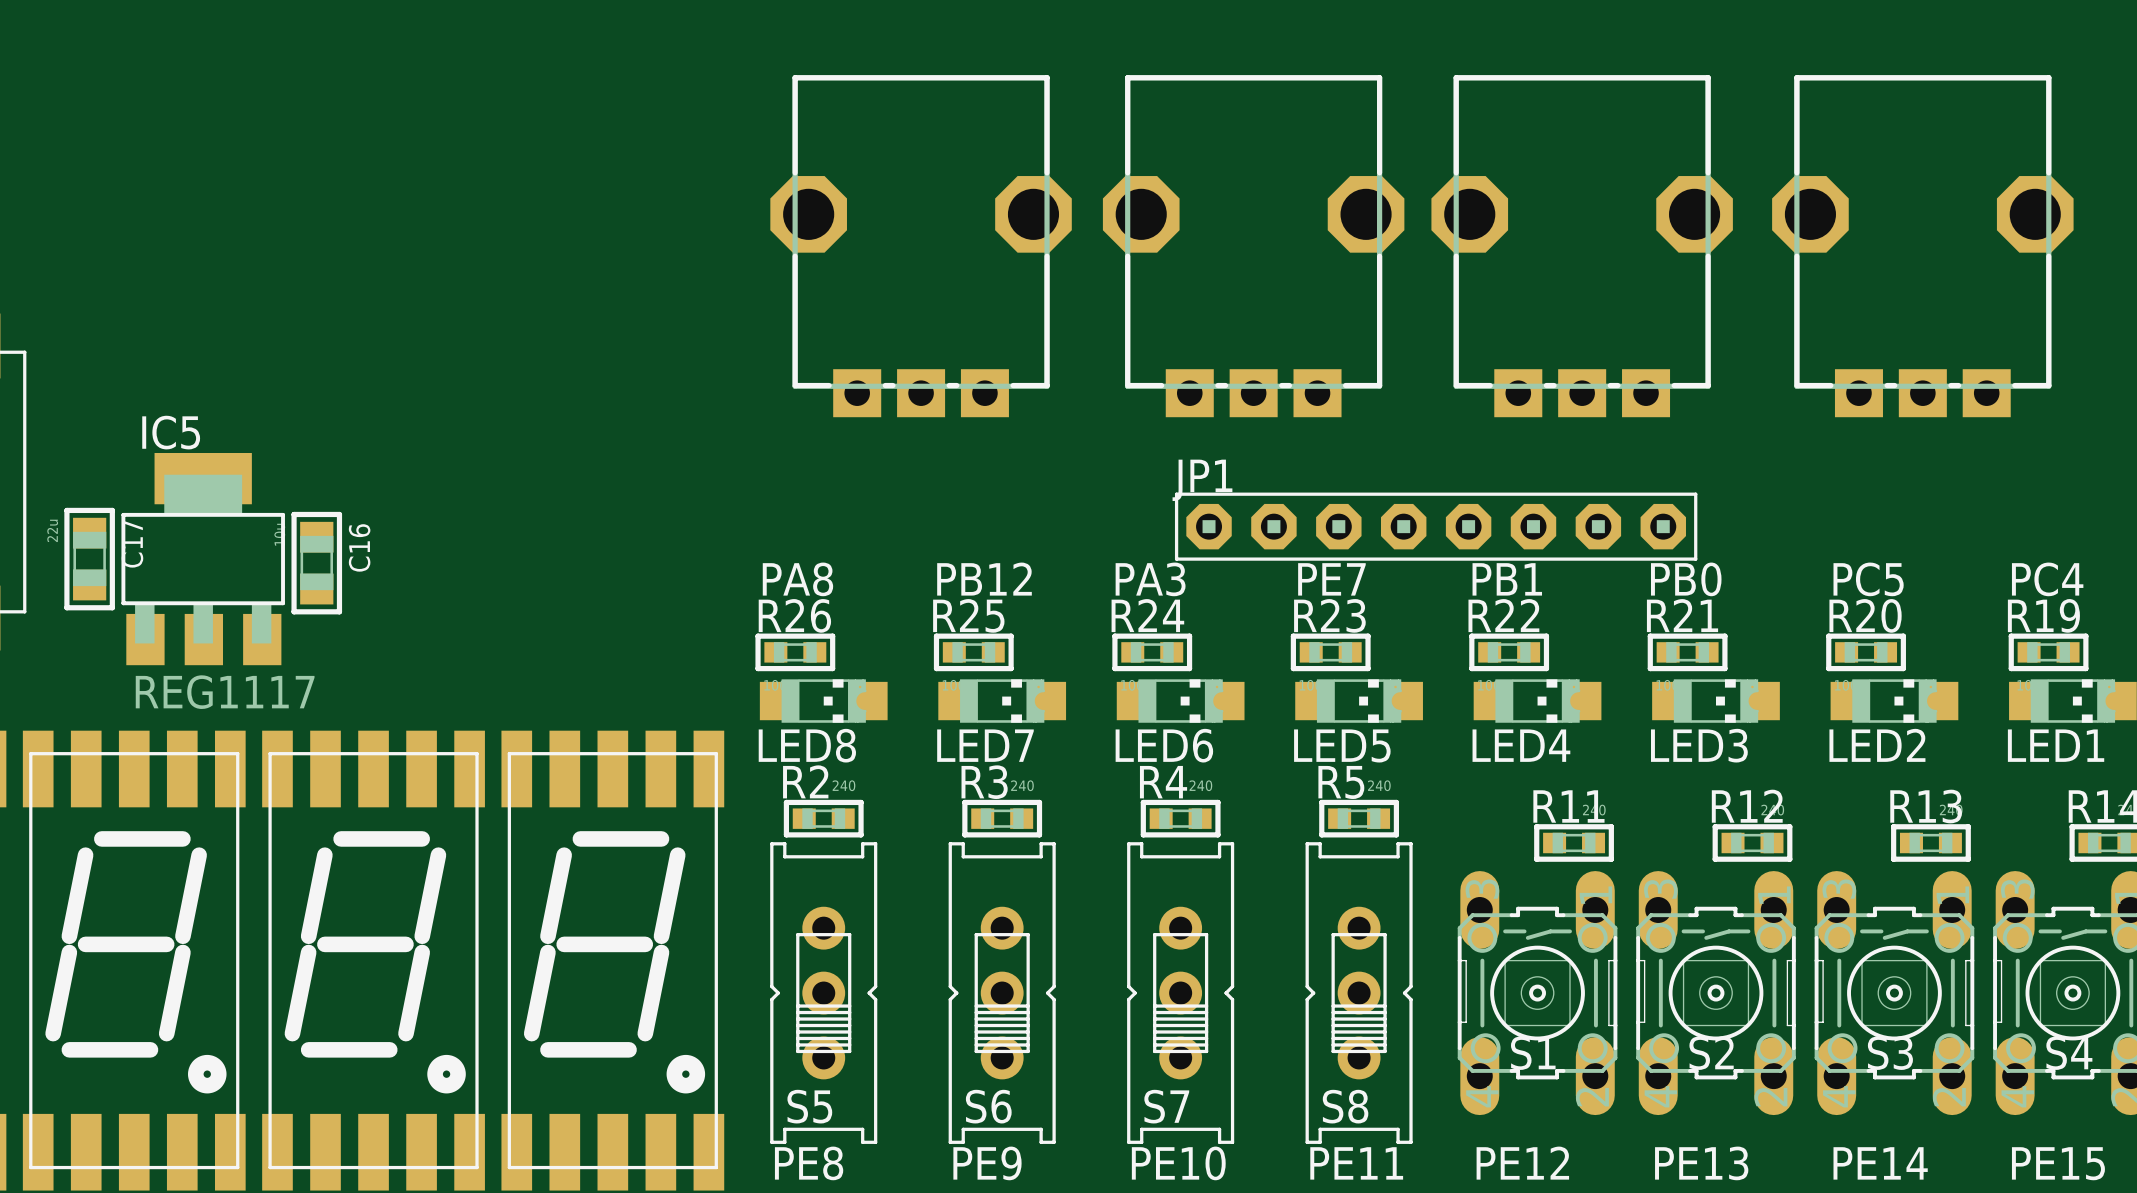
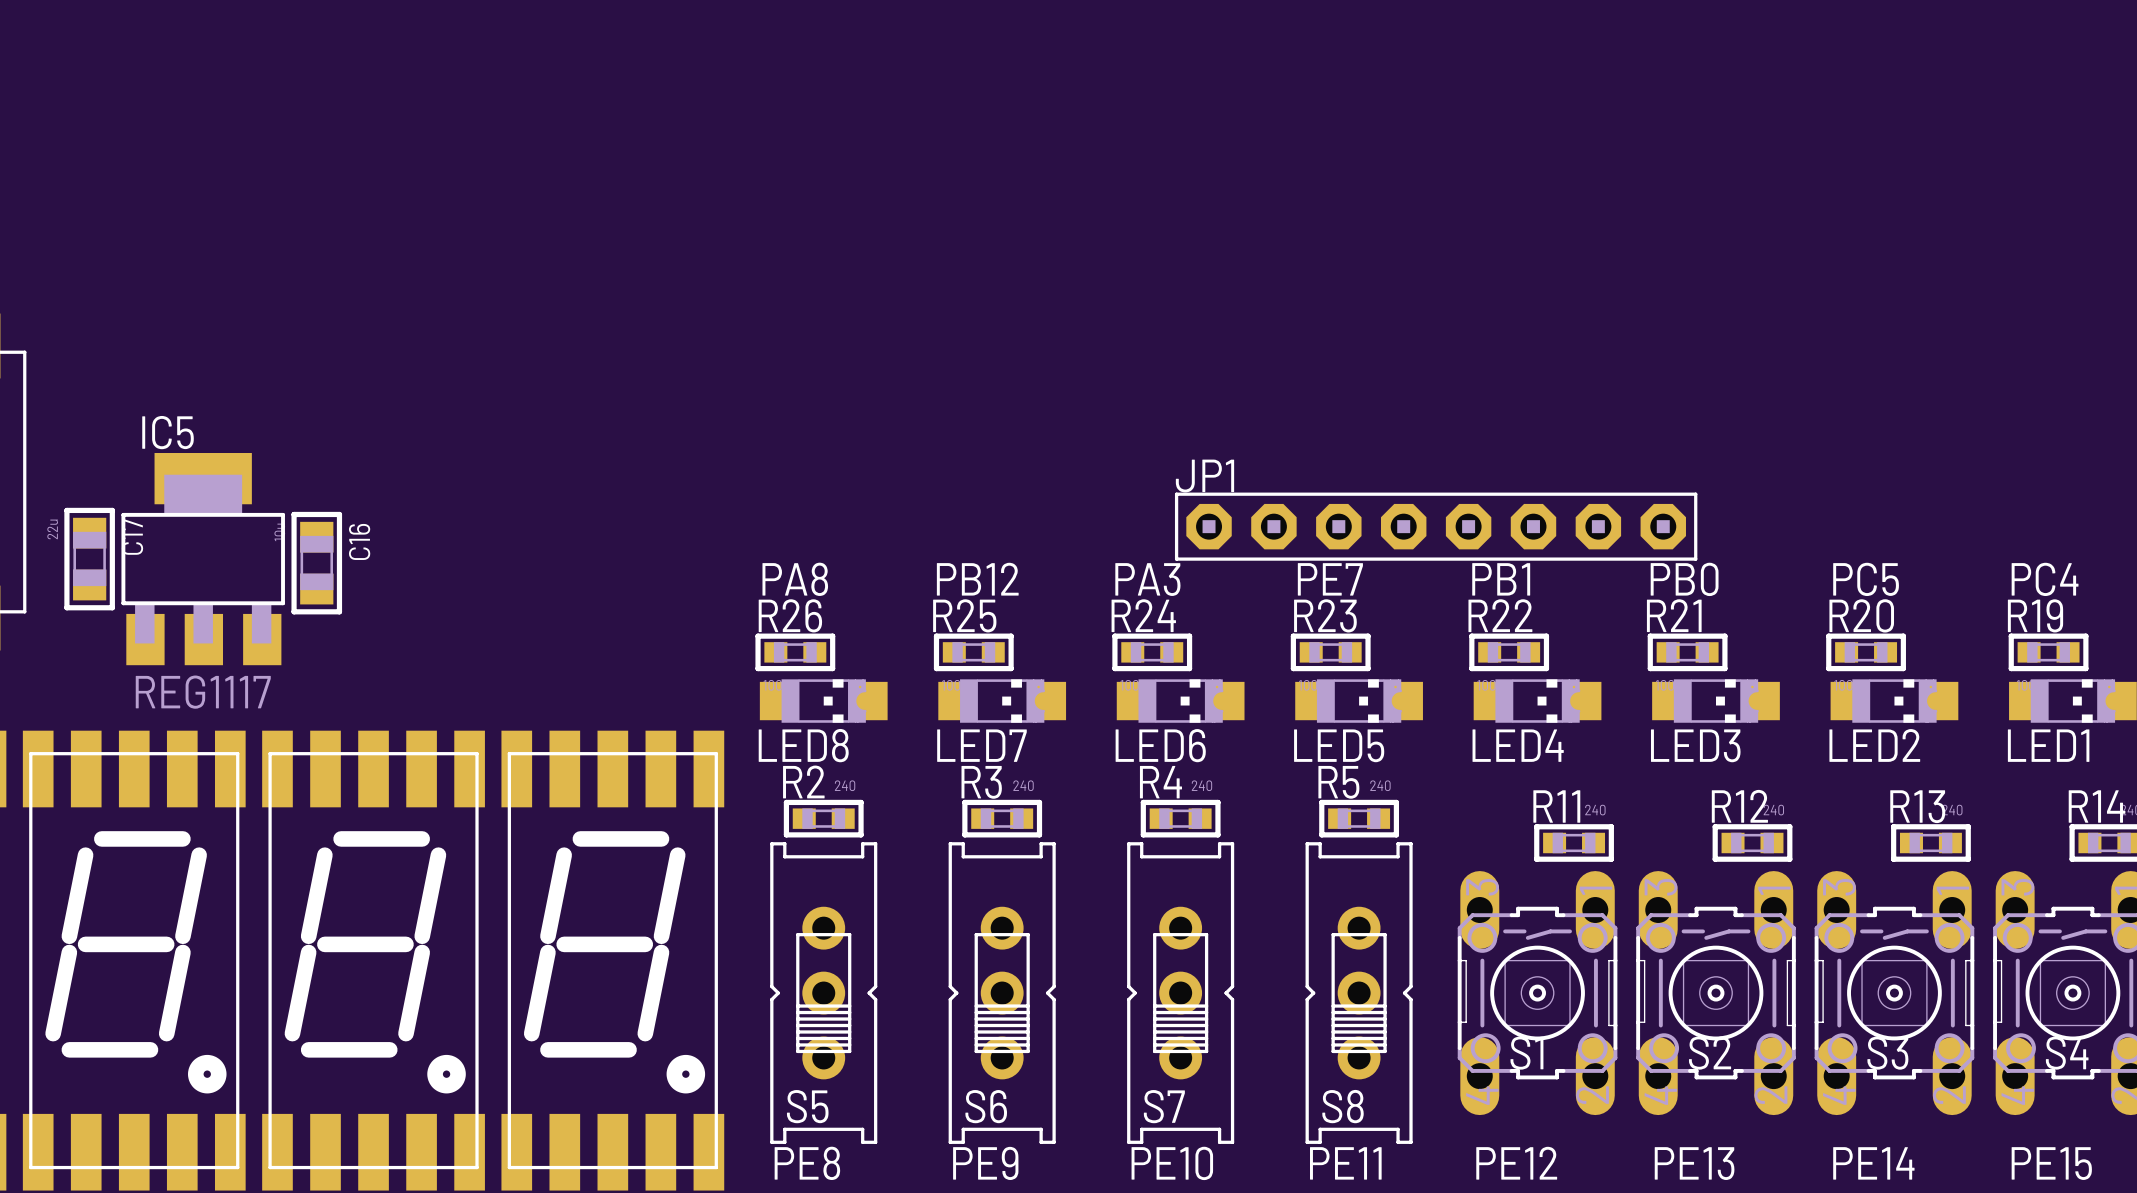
part: (921, 246) -> none
part: (1253, 246) -> none
part: (1582, 246) -> none
part: (1922, 246) -> none

